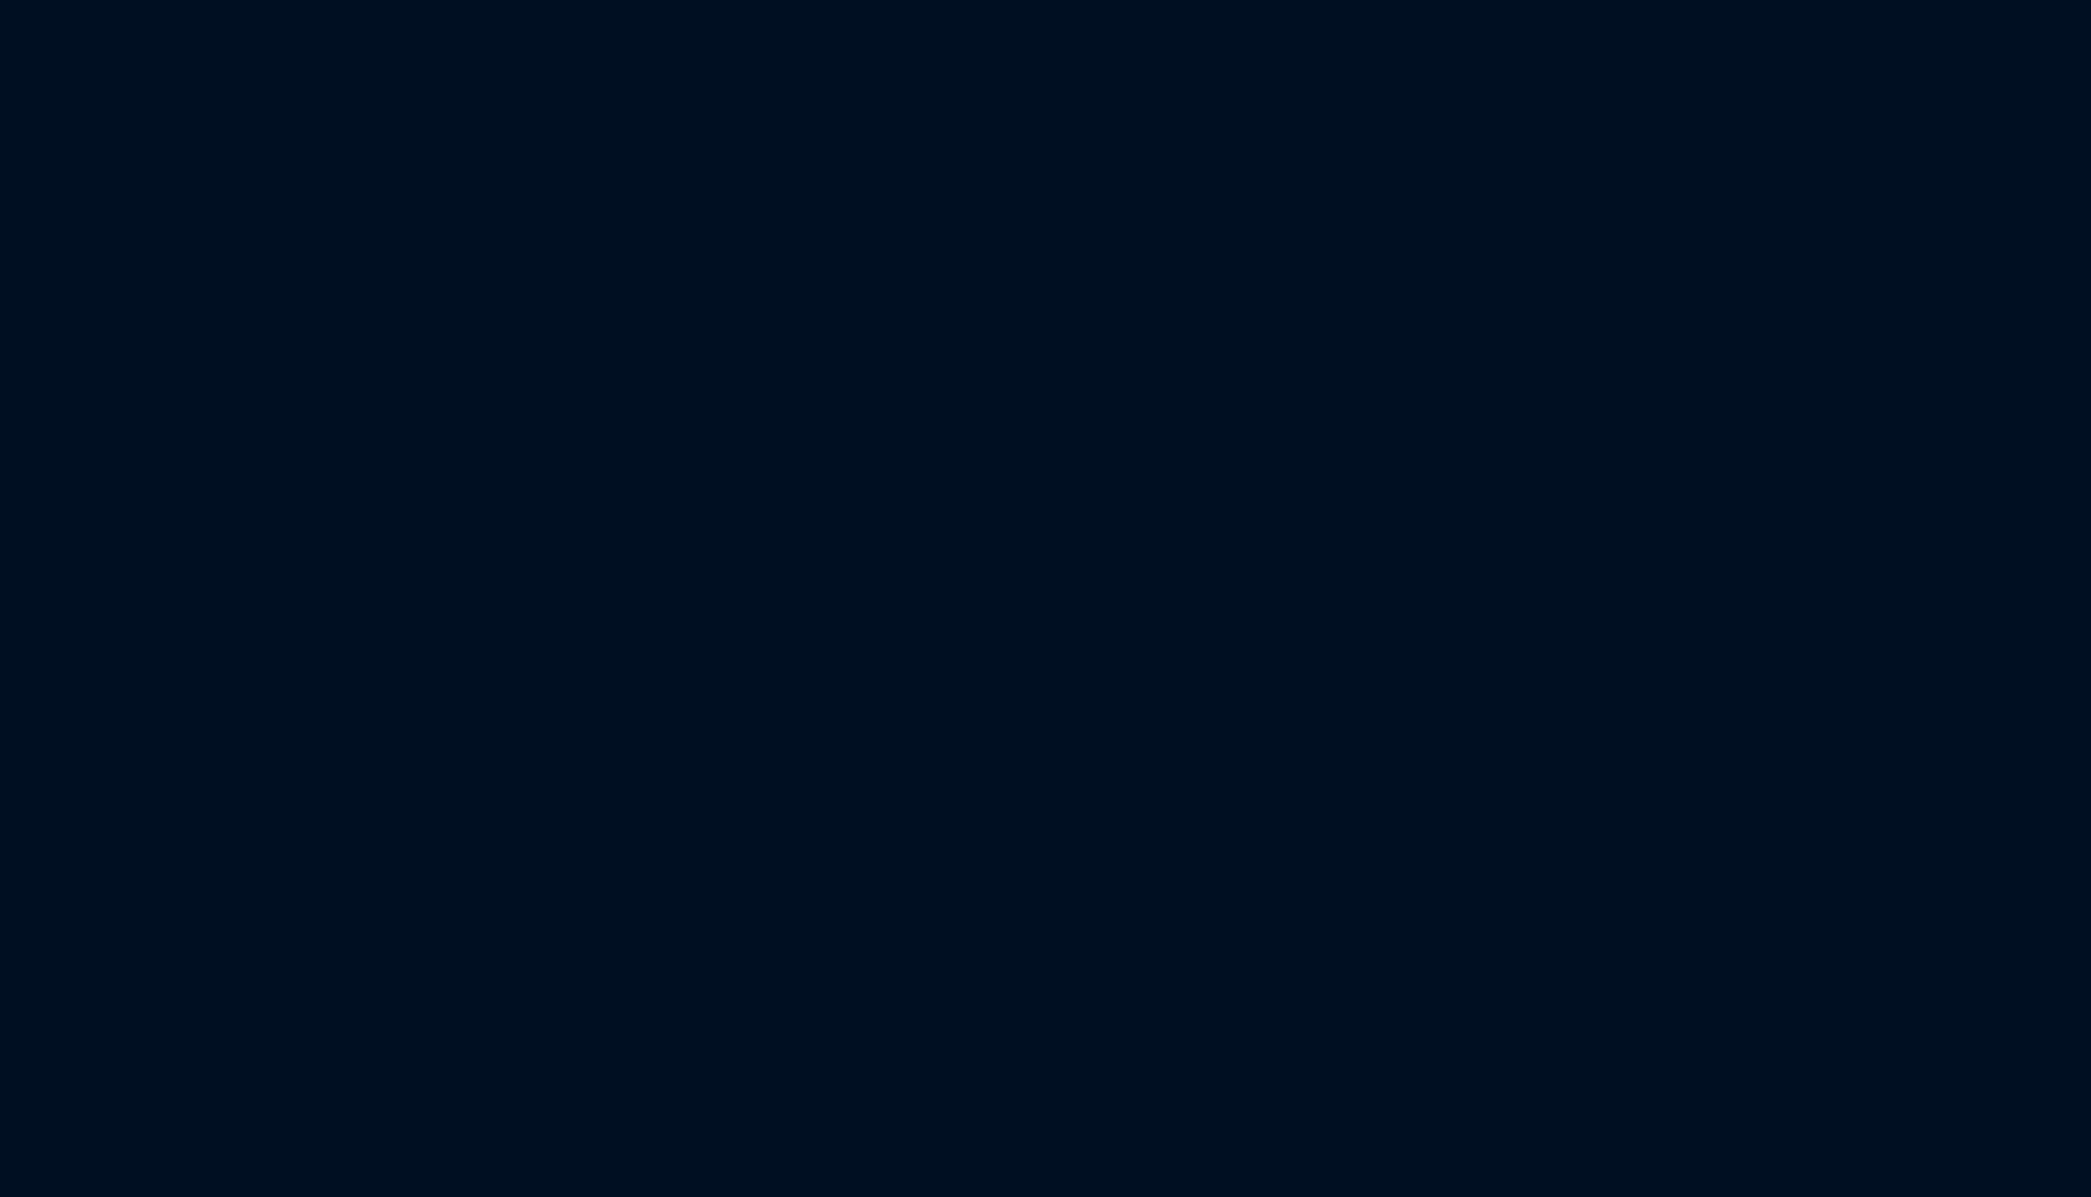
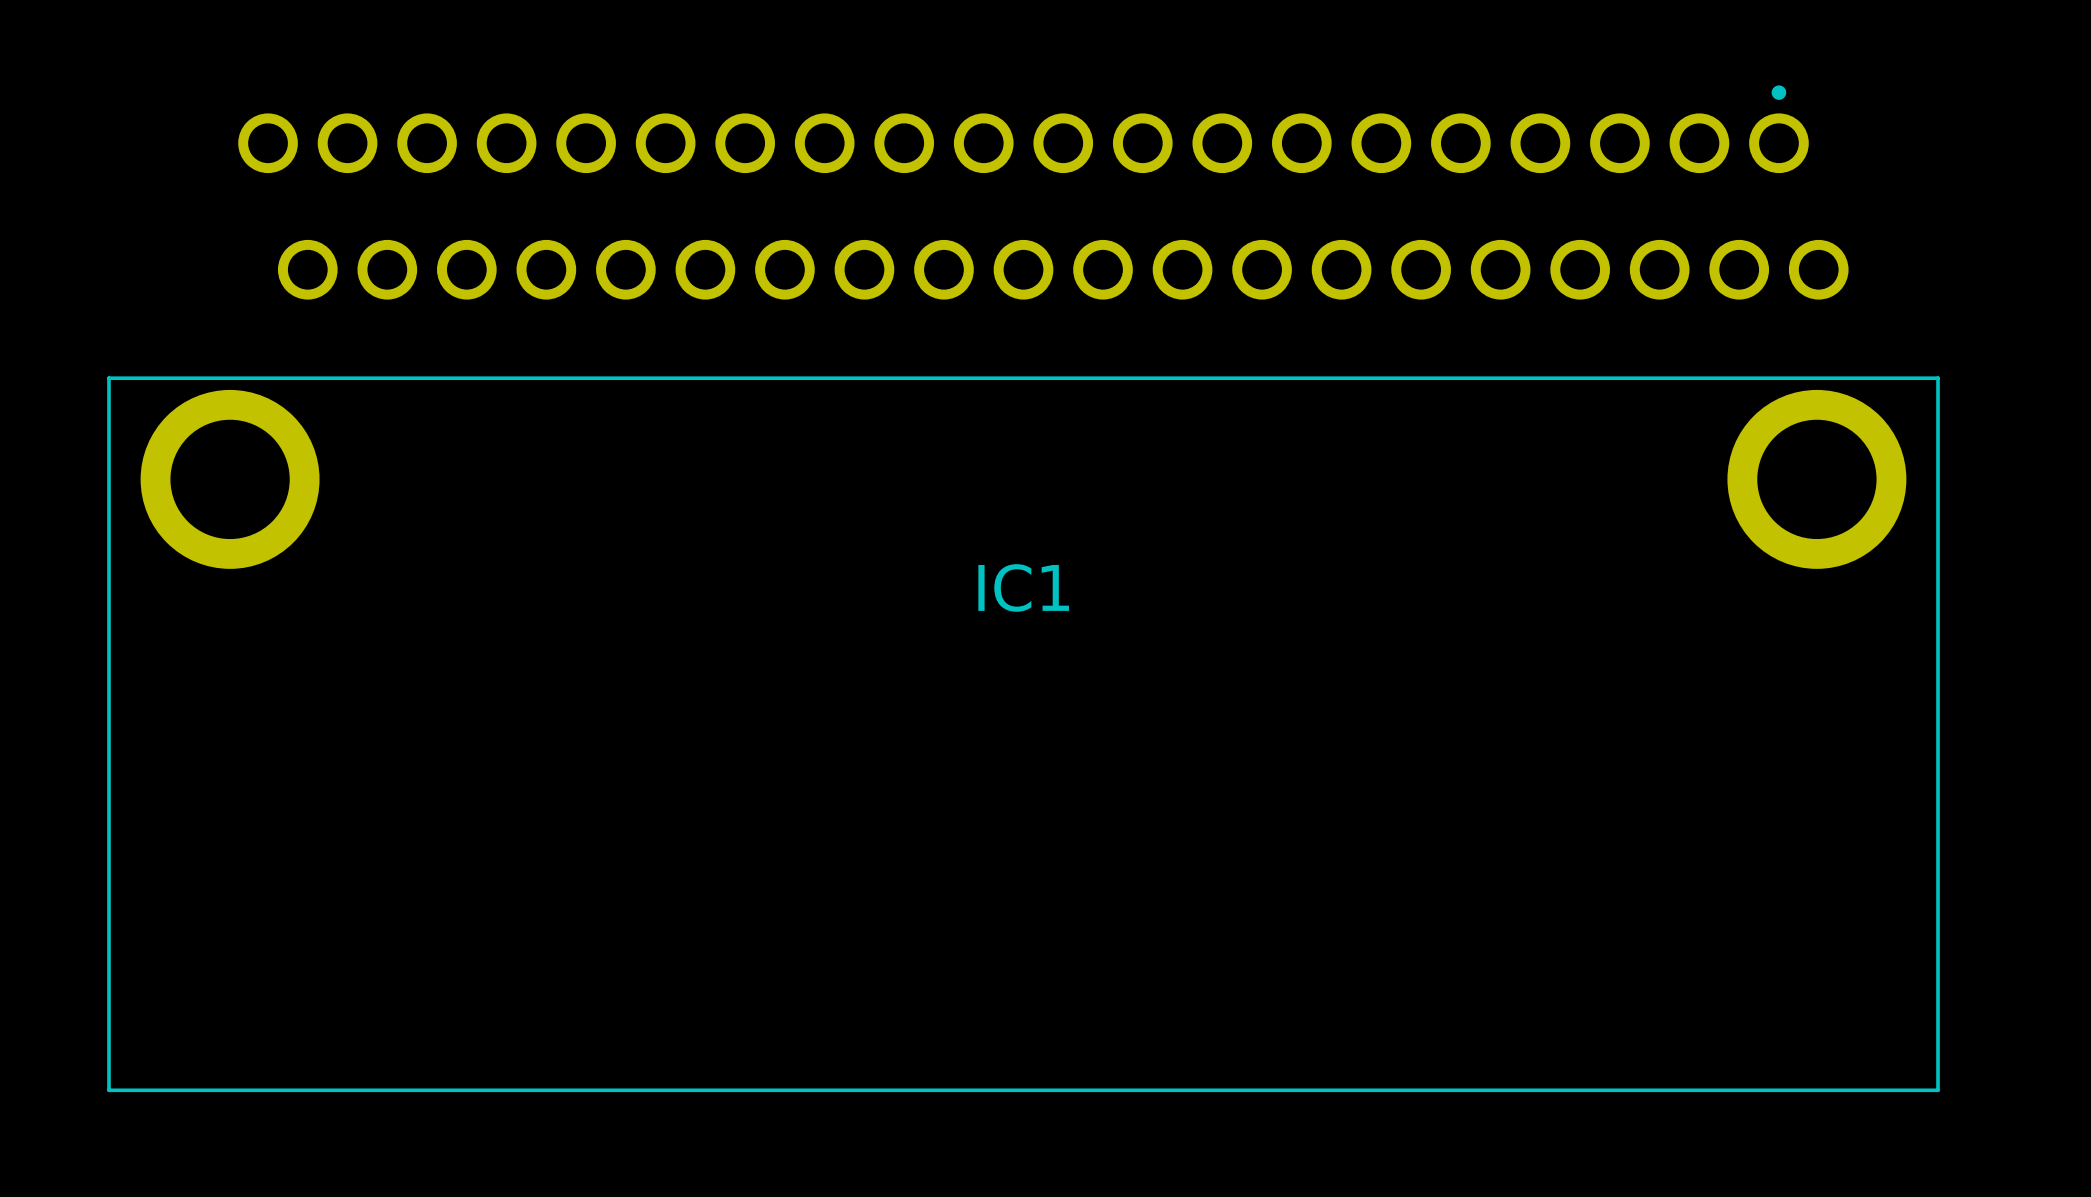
IC1: none -> (1023, 588)

